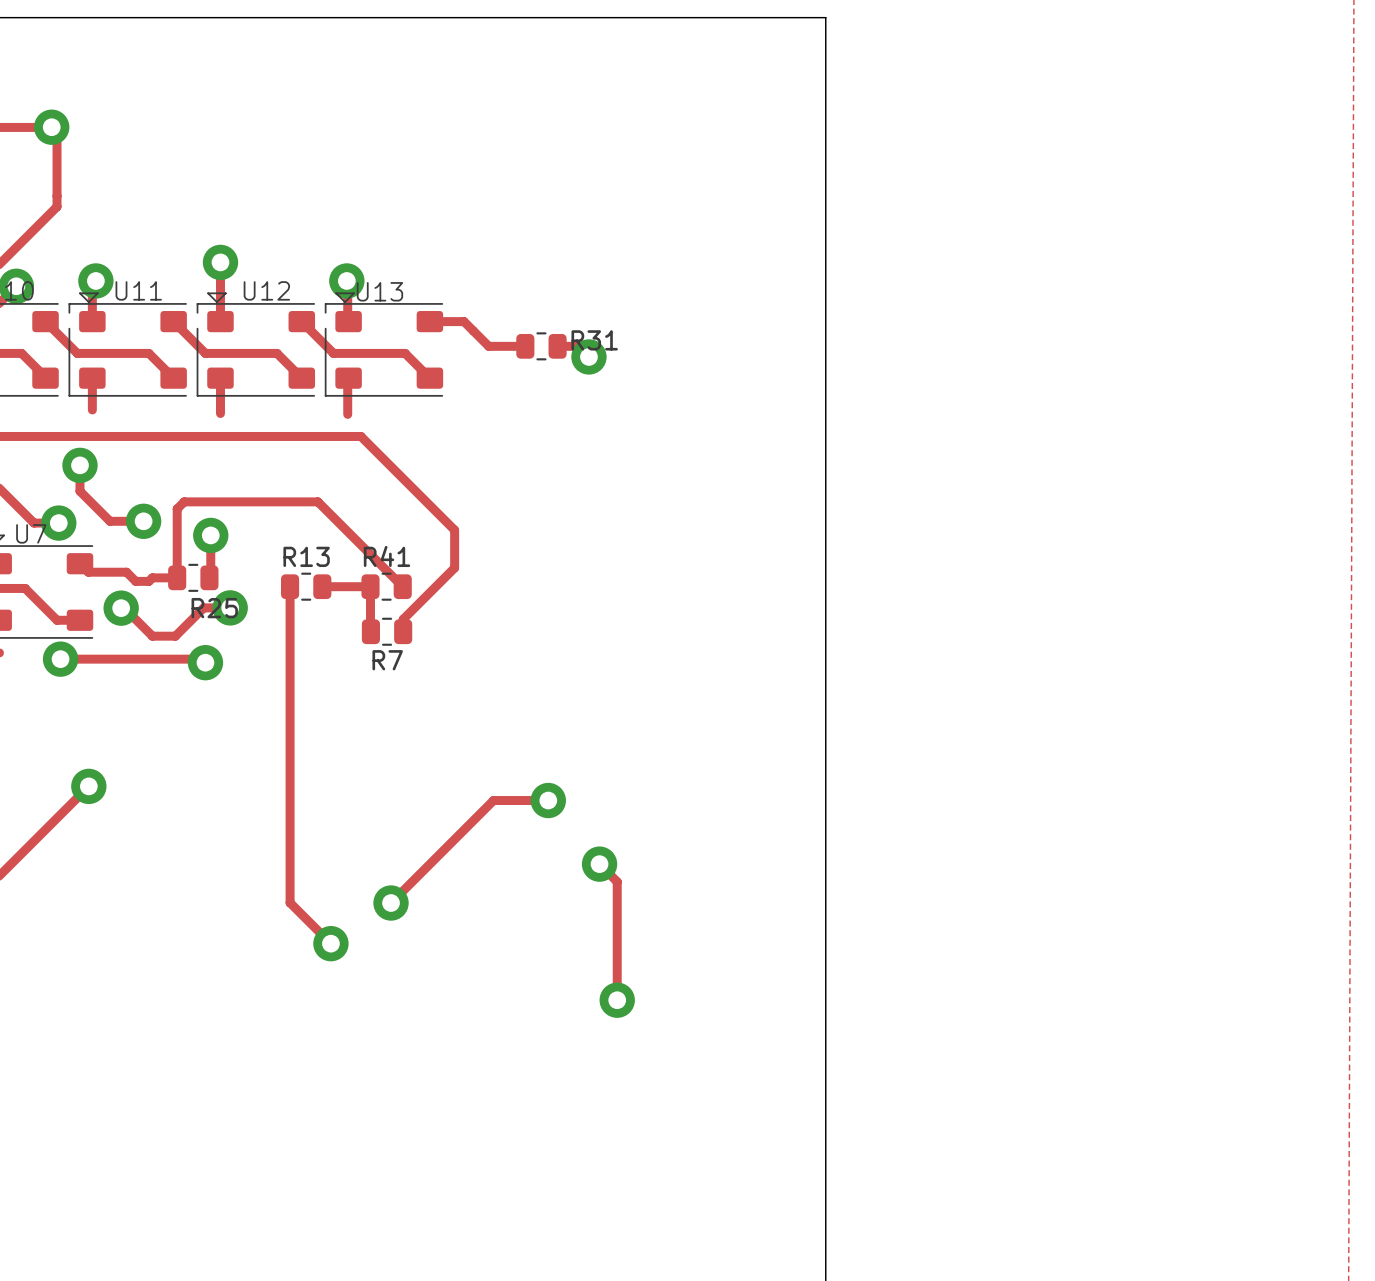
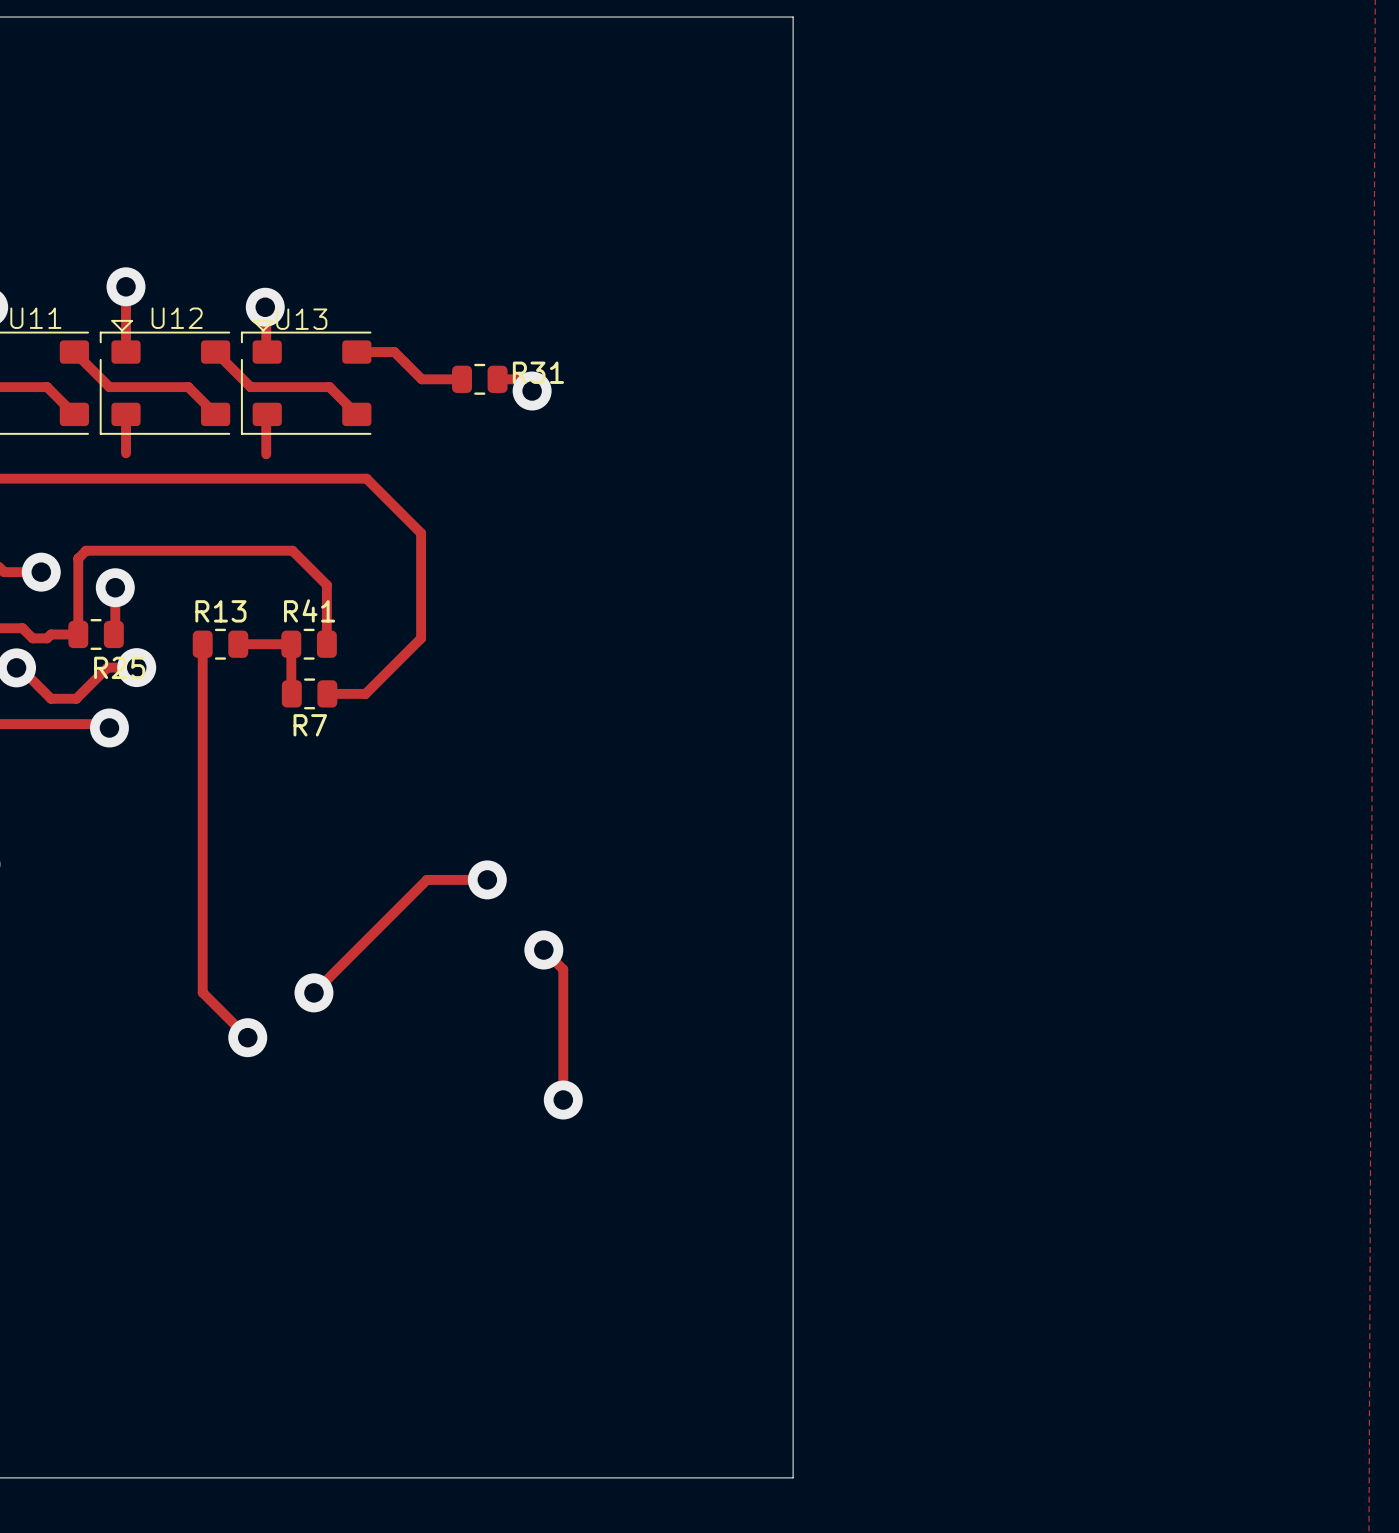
track: (360, 436) (454, 530) (454, 567) (403, 619) (403, 631) -> (280, 478) (366, 478) (421, 533) (421, 638) (365, 693) (327, 693)
track: (317, 501) (402, 586) -> (233, 550) (292, 550) (326, 585) (326, 644)

